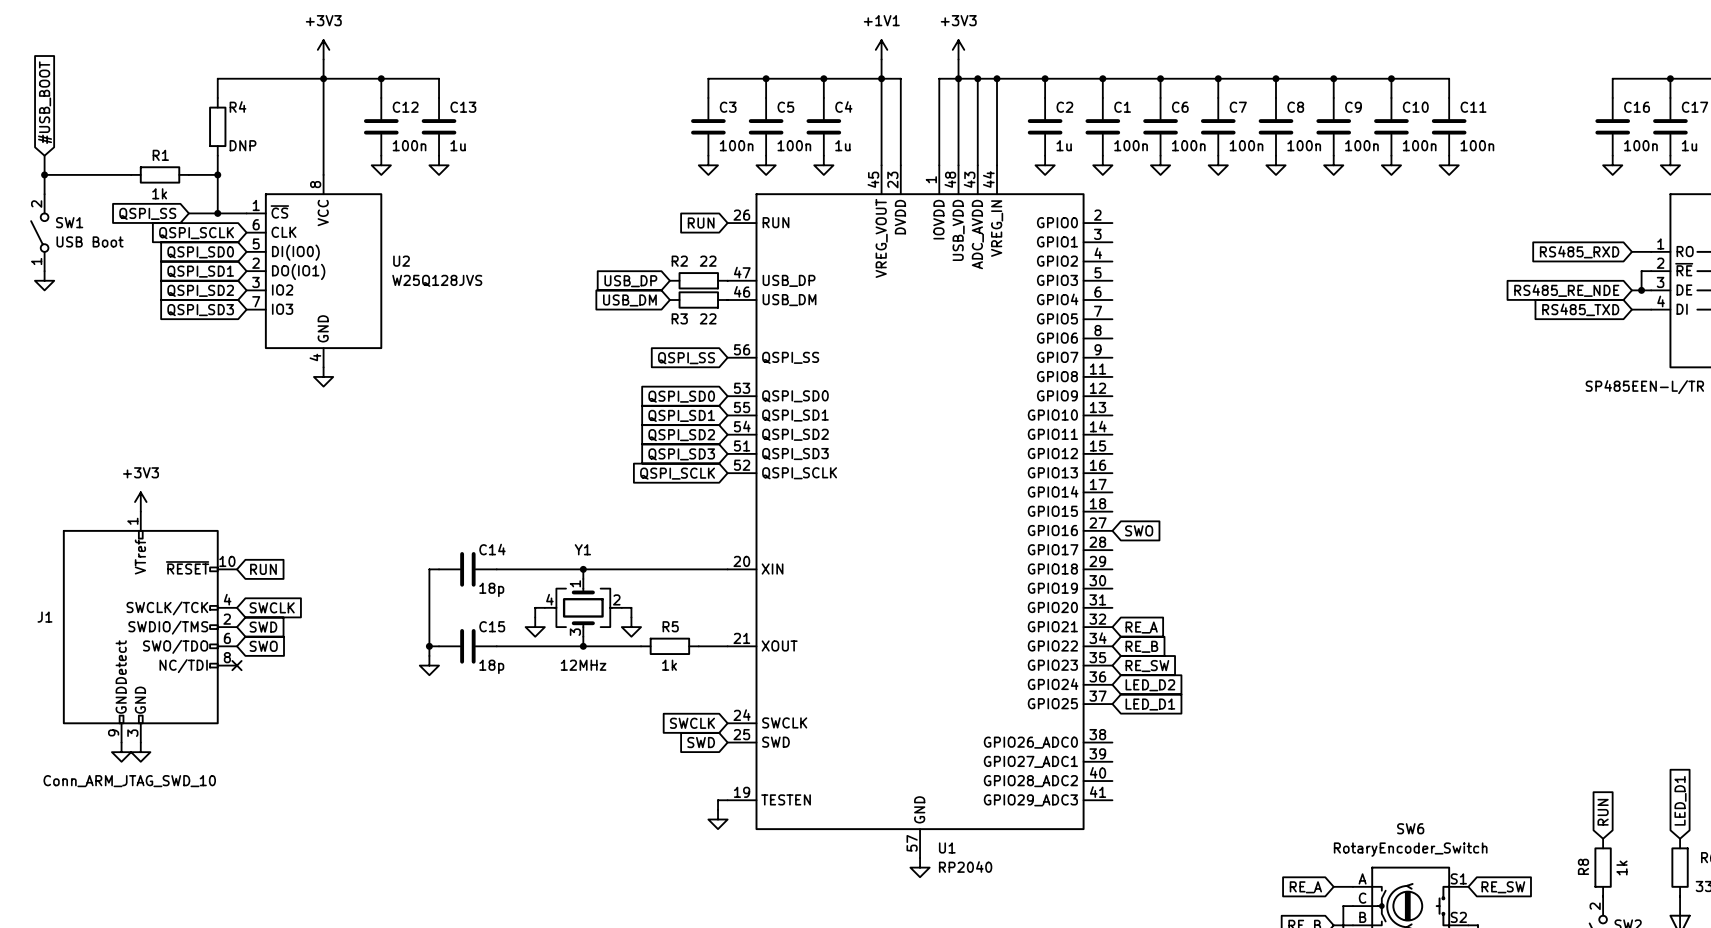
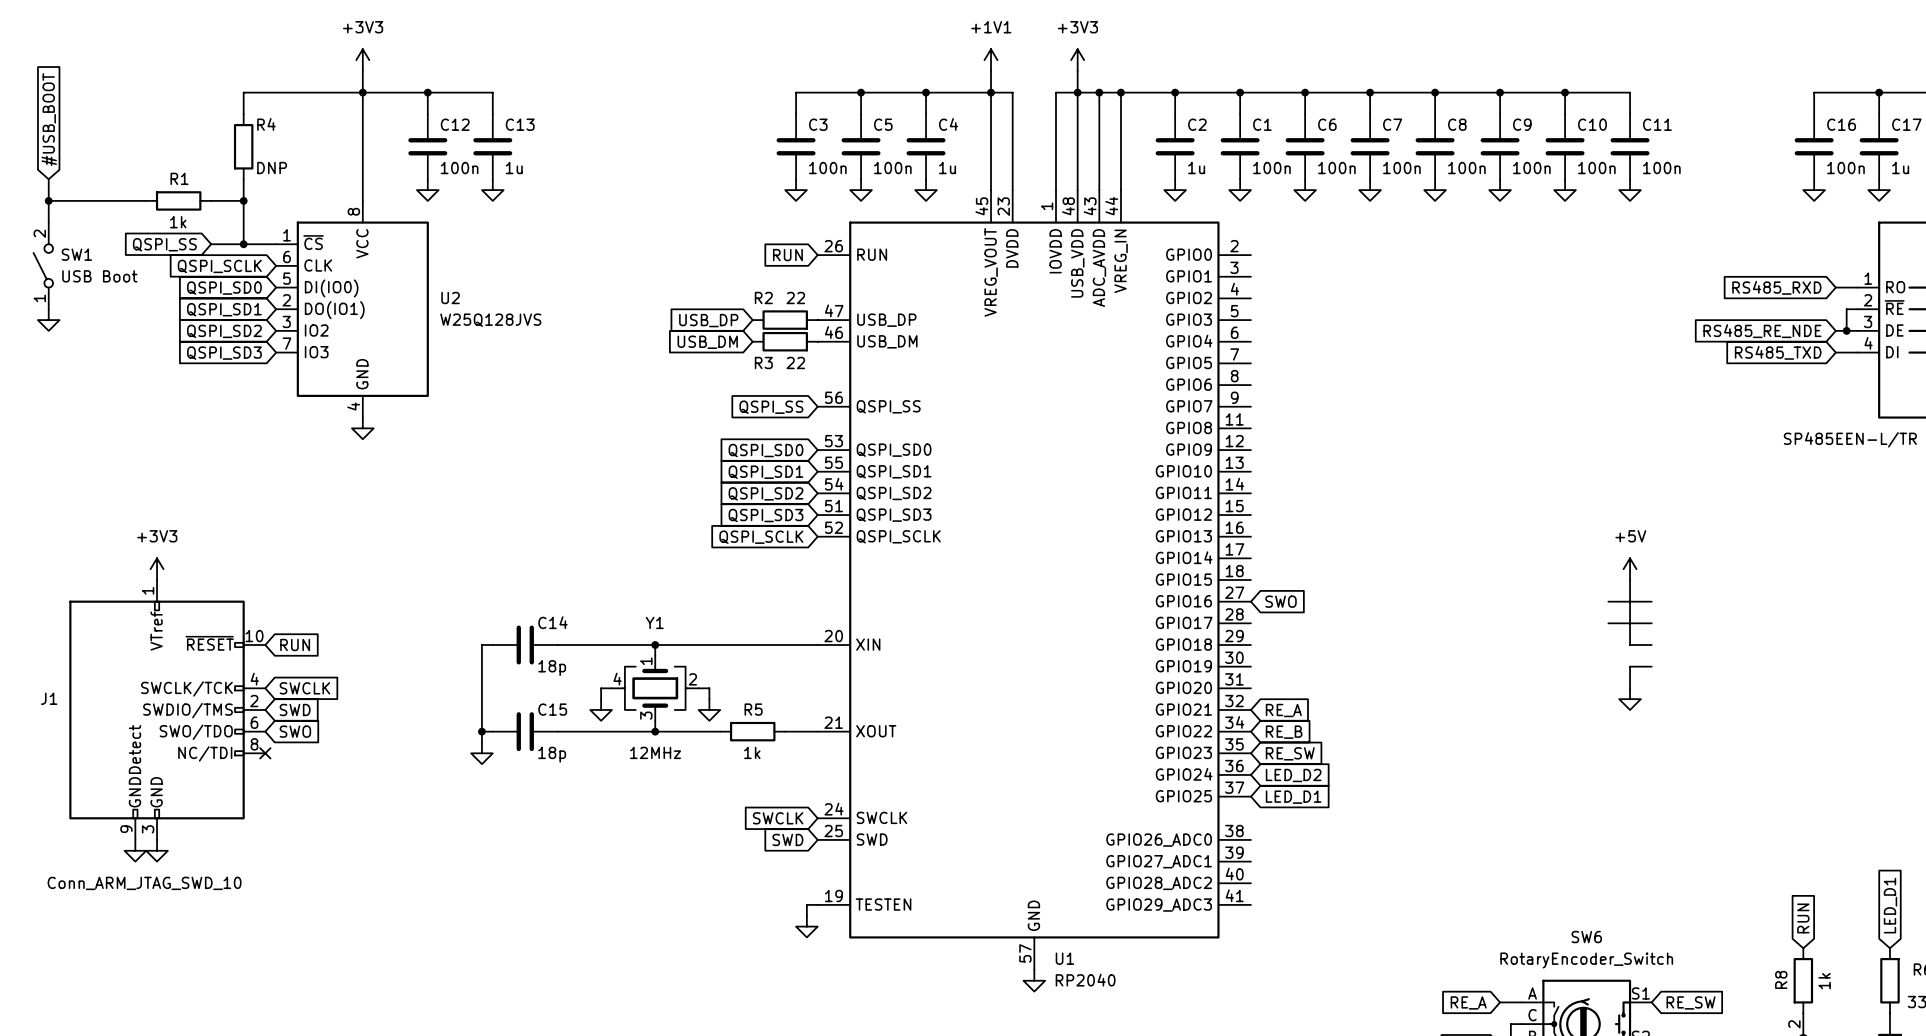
power symbol: none -> +5V (1630, 569)
wire: none -> (1630, 580) (1630, 645) (1651, 645)
wire: none -> (1608, 601) (1651, 601)
wire: none -> (1608, 623) (1651, 623)
wire: none -> (1651, 666) (1630, 666) (1630, 688)
power symbol: none -> (1630, 699)

